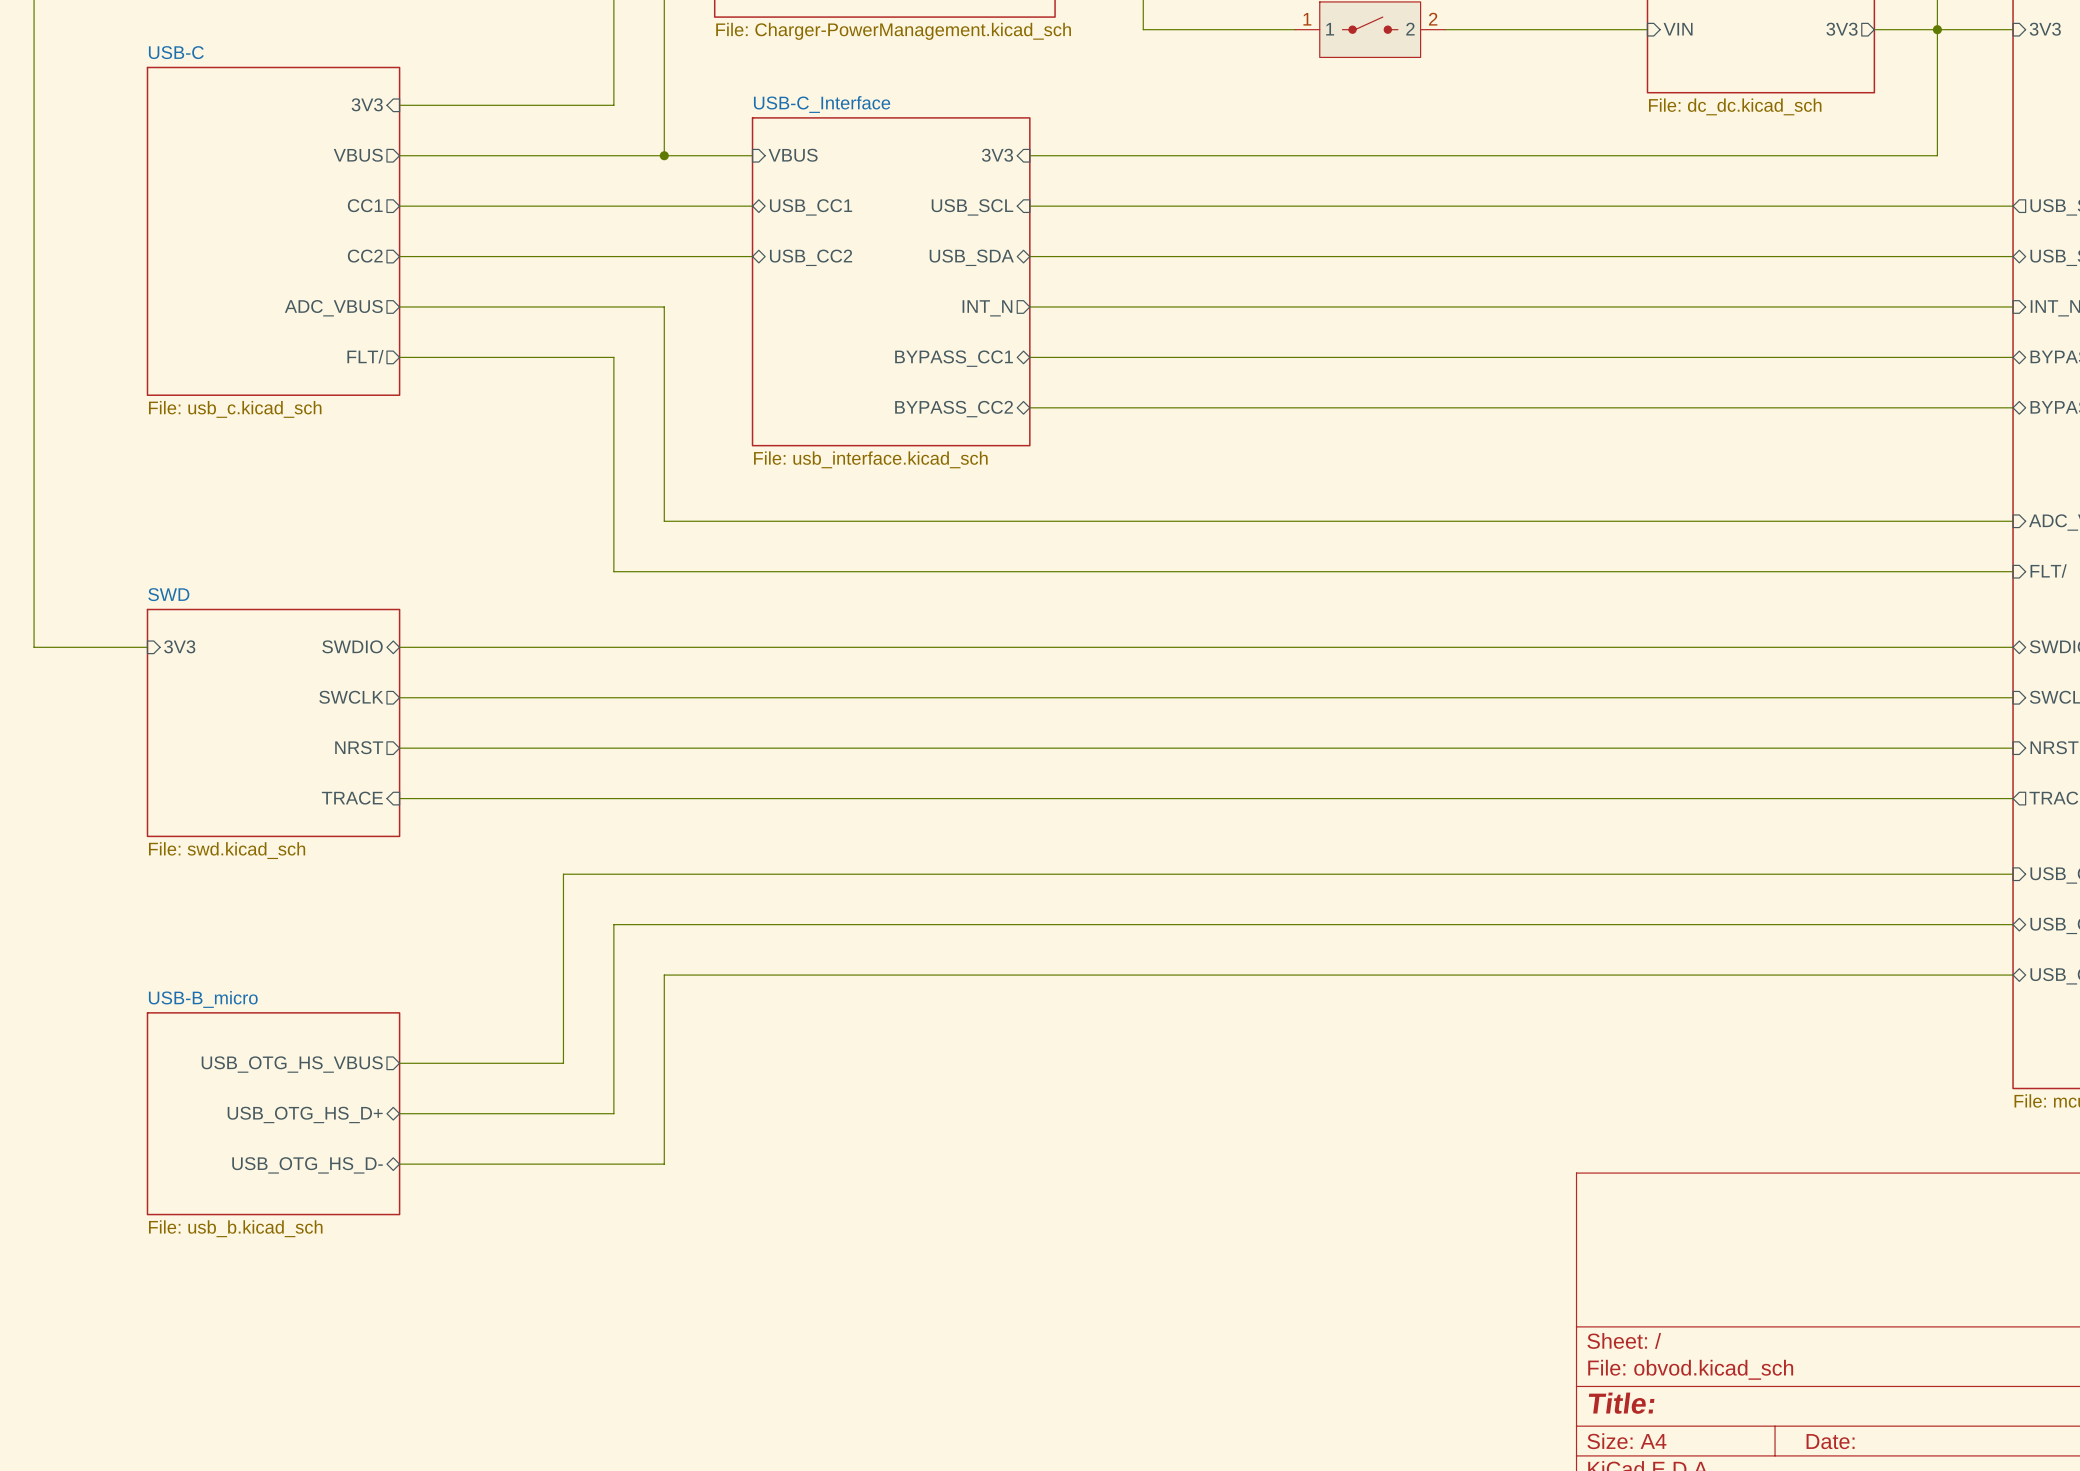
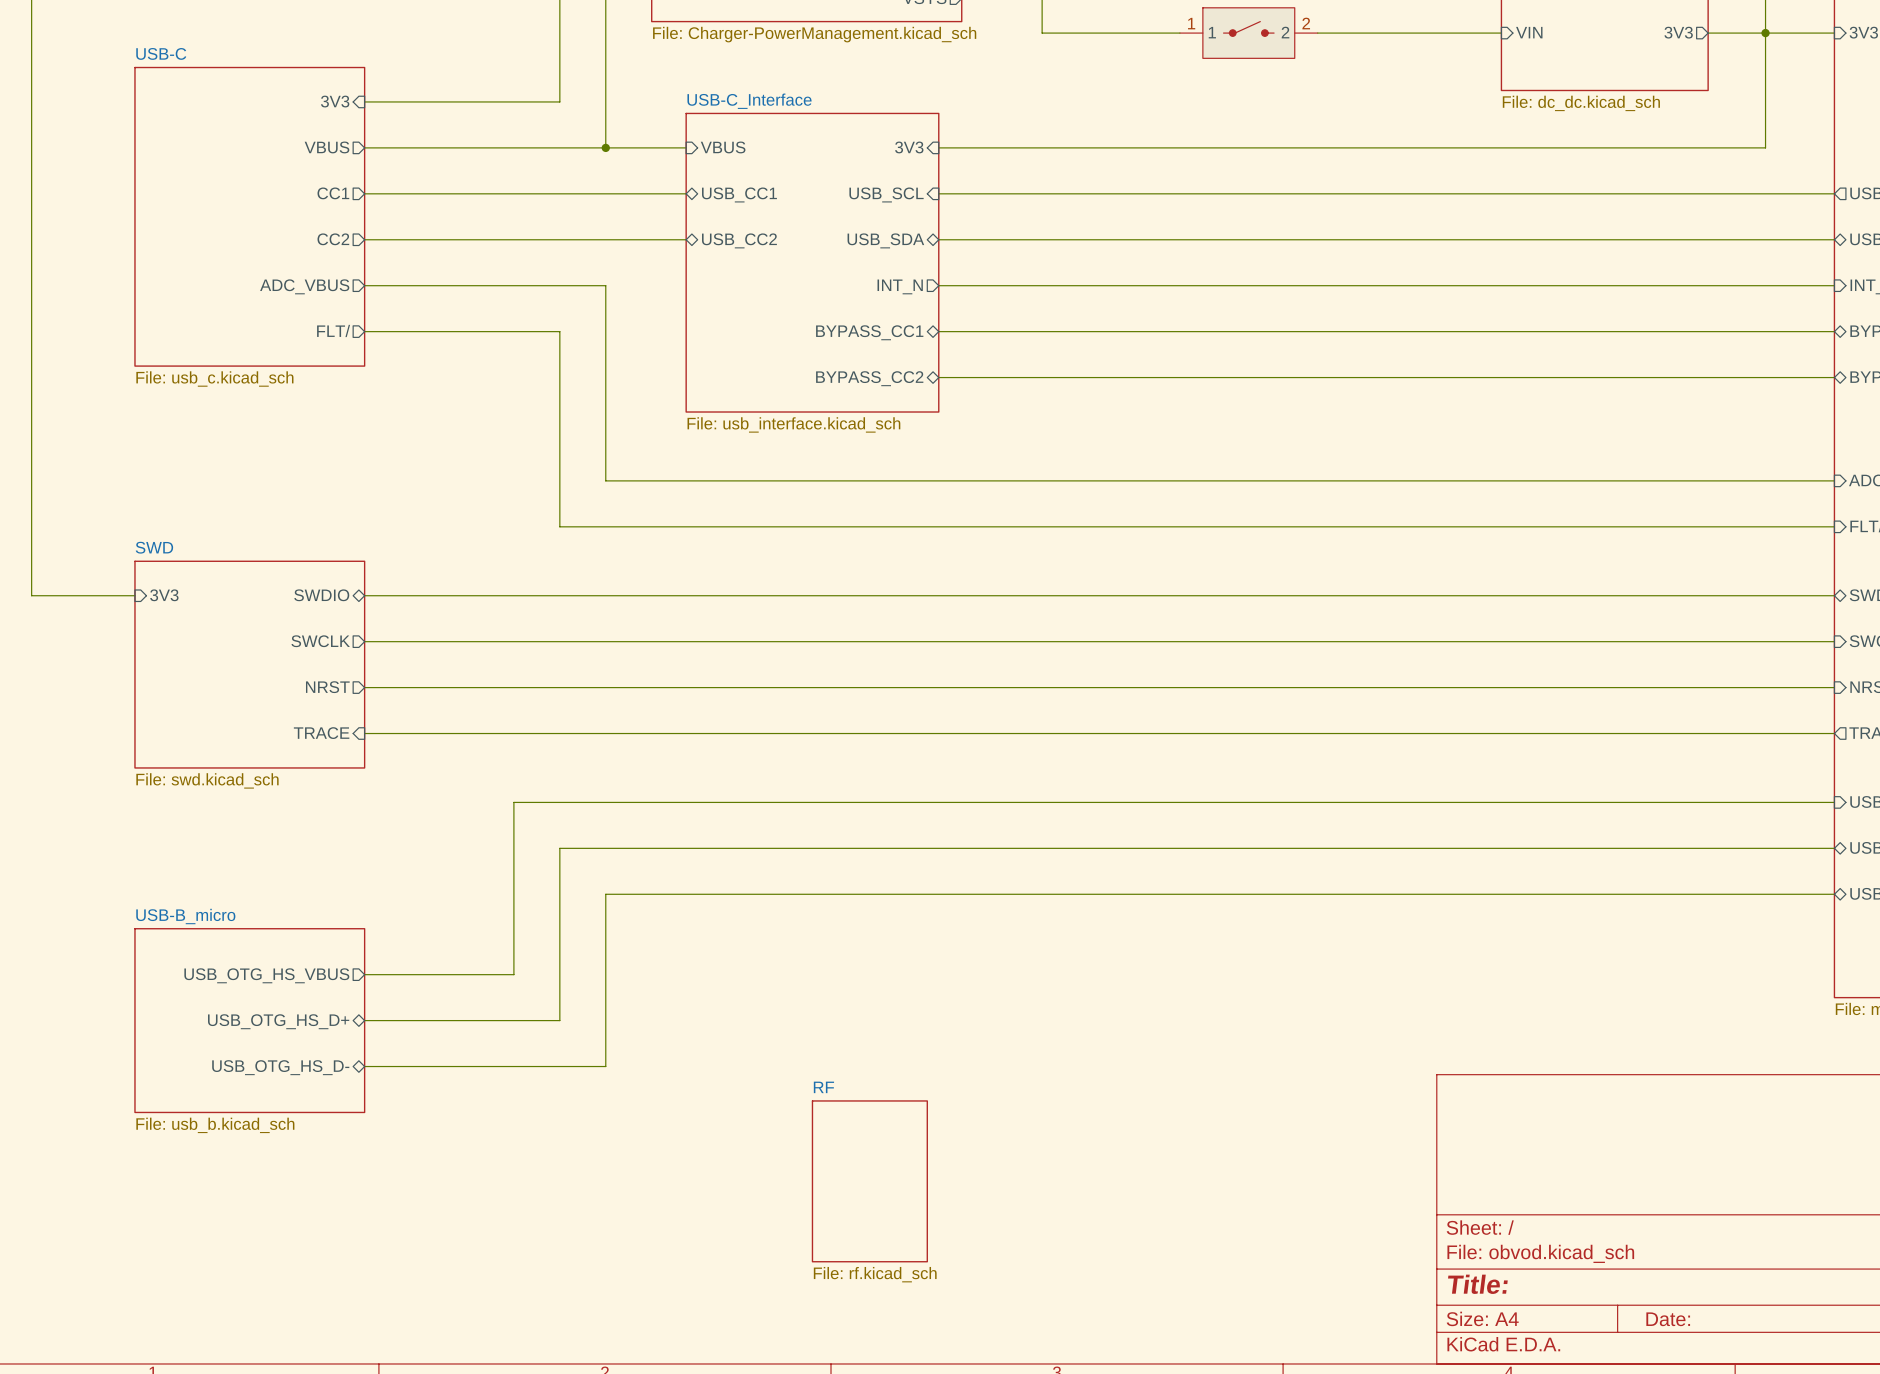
sheet RF: none -> File: rf.kicad_sch (869, 1181)

